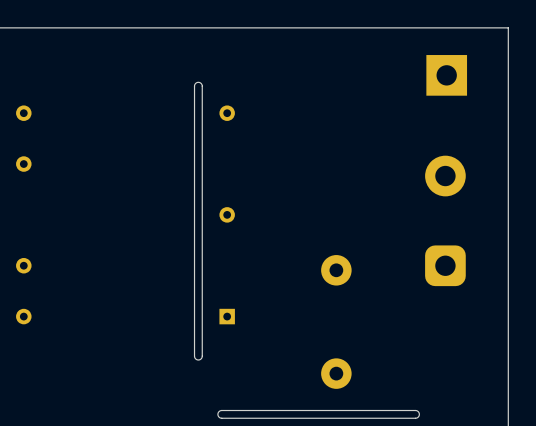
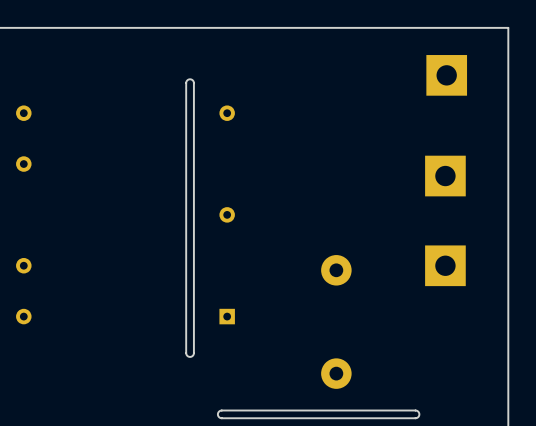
board edge: none -> (193, 83) (193, 353) (190, 356) (186, 353) (186, 83) (190, 79) (193, 83)
board edge: (202, 86) (202, 356) (198, 360) (194, 356) (194, 86) (198, 82) (202, 86) -> none
part footprint: [425, 155, 466, 197] -> [425, 155, 466, 197]
part footprint: [425, 245, 466, 287] -> [425, 245, 466, 287]

